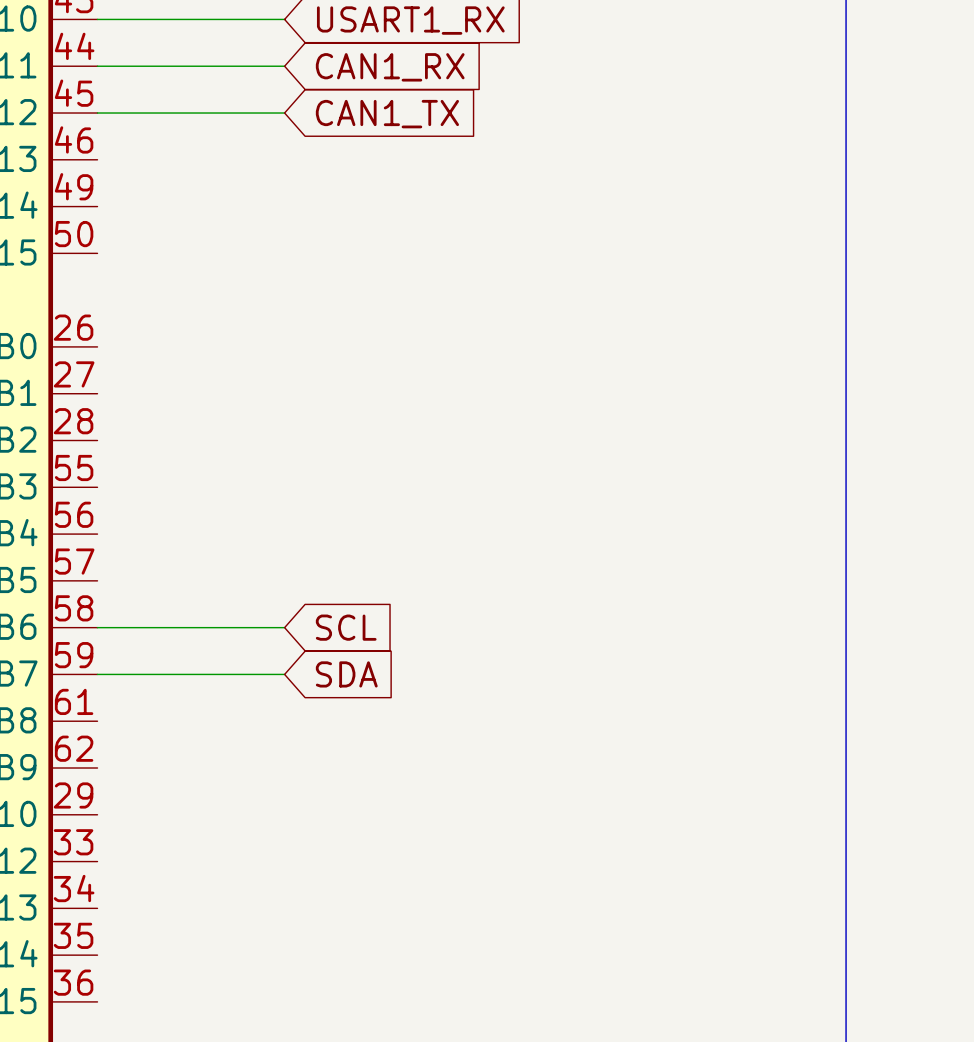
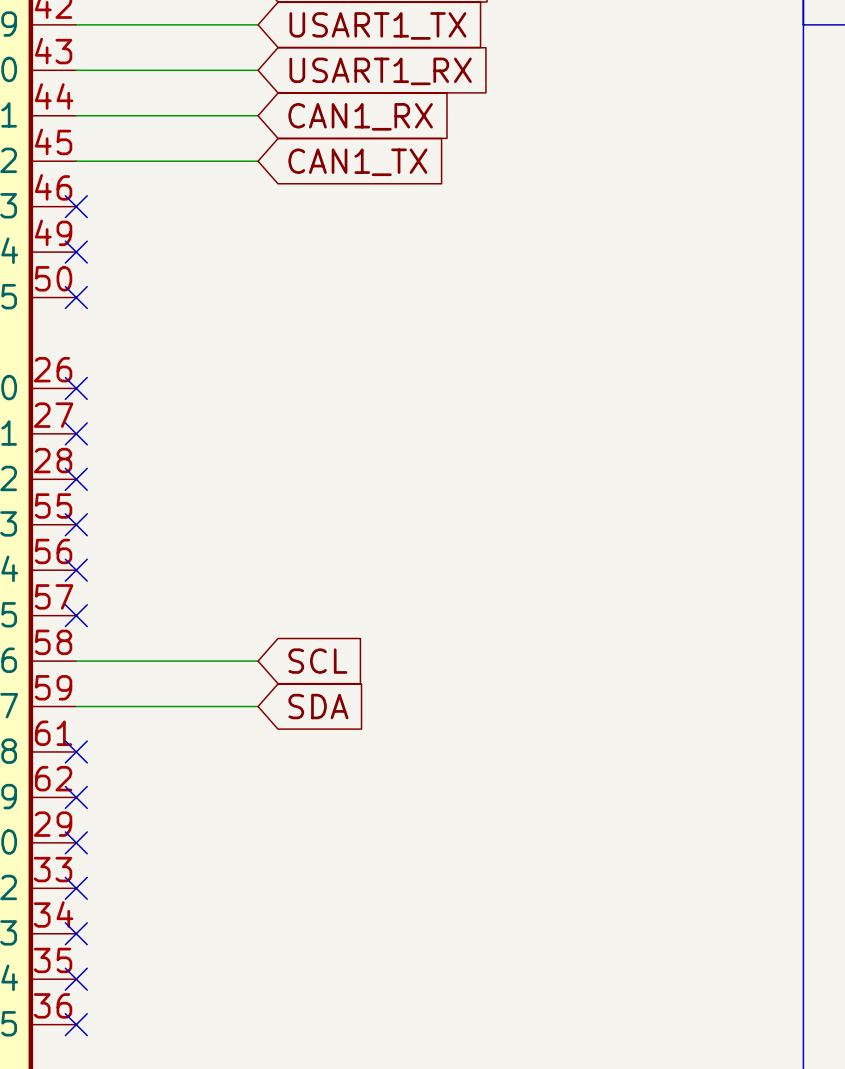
no-connect mark: none -> (76, 206)
no-connect mark: none -> (76, 252)
no-connect mark: none -> (76, 297)
no-connect mark: none -> (76, 388)
no-connect mark: none -> (76, 433)
no-connect mark: none -> (76, 479)
no-connect mark: none -> (76, 524)
no-connect mark: none -> (76, 570)
no-connect mark: none -> (76, 615)
no-connect mark: none -> (76, 751)
no-connect mark: none -> (76, 797)
no-connect mark: none -> (76, 842)
no-connect mark: none -> (76, 888)
no-connect mark: none -> (76, 933)
no-connect mark: none -> (76, 979)
no-connect mark: none -> (76, 1024)

